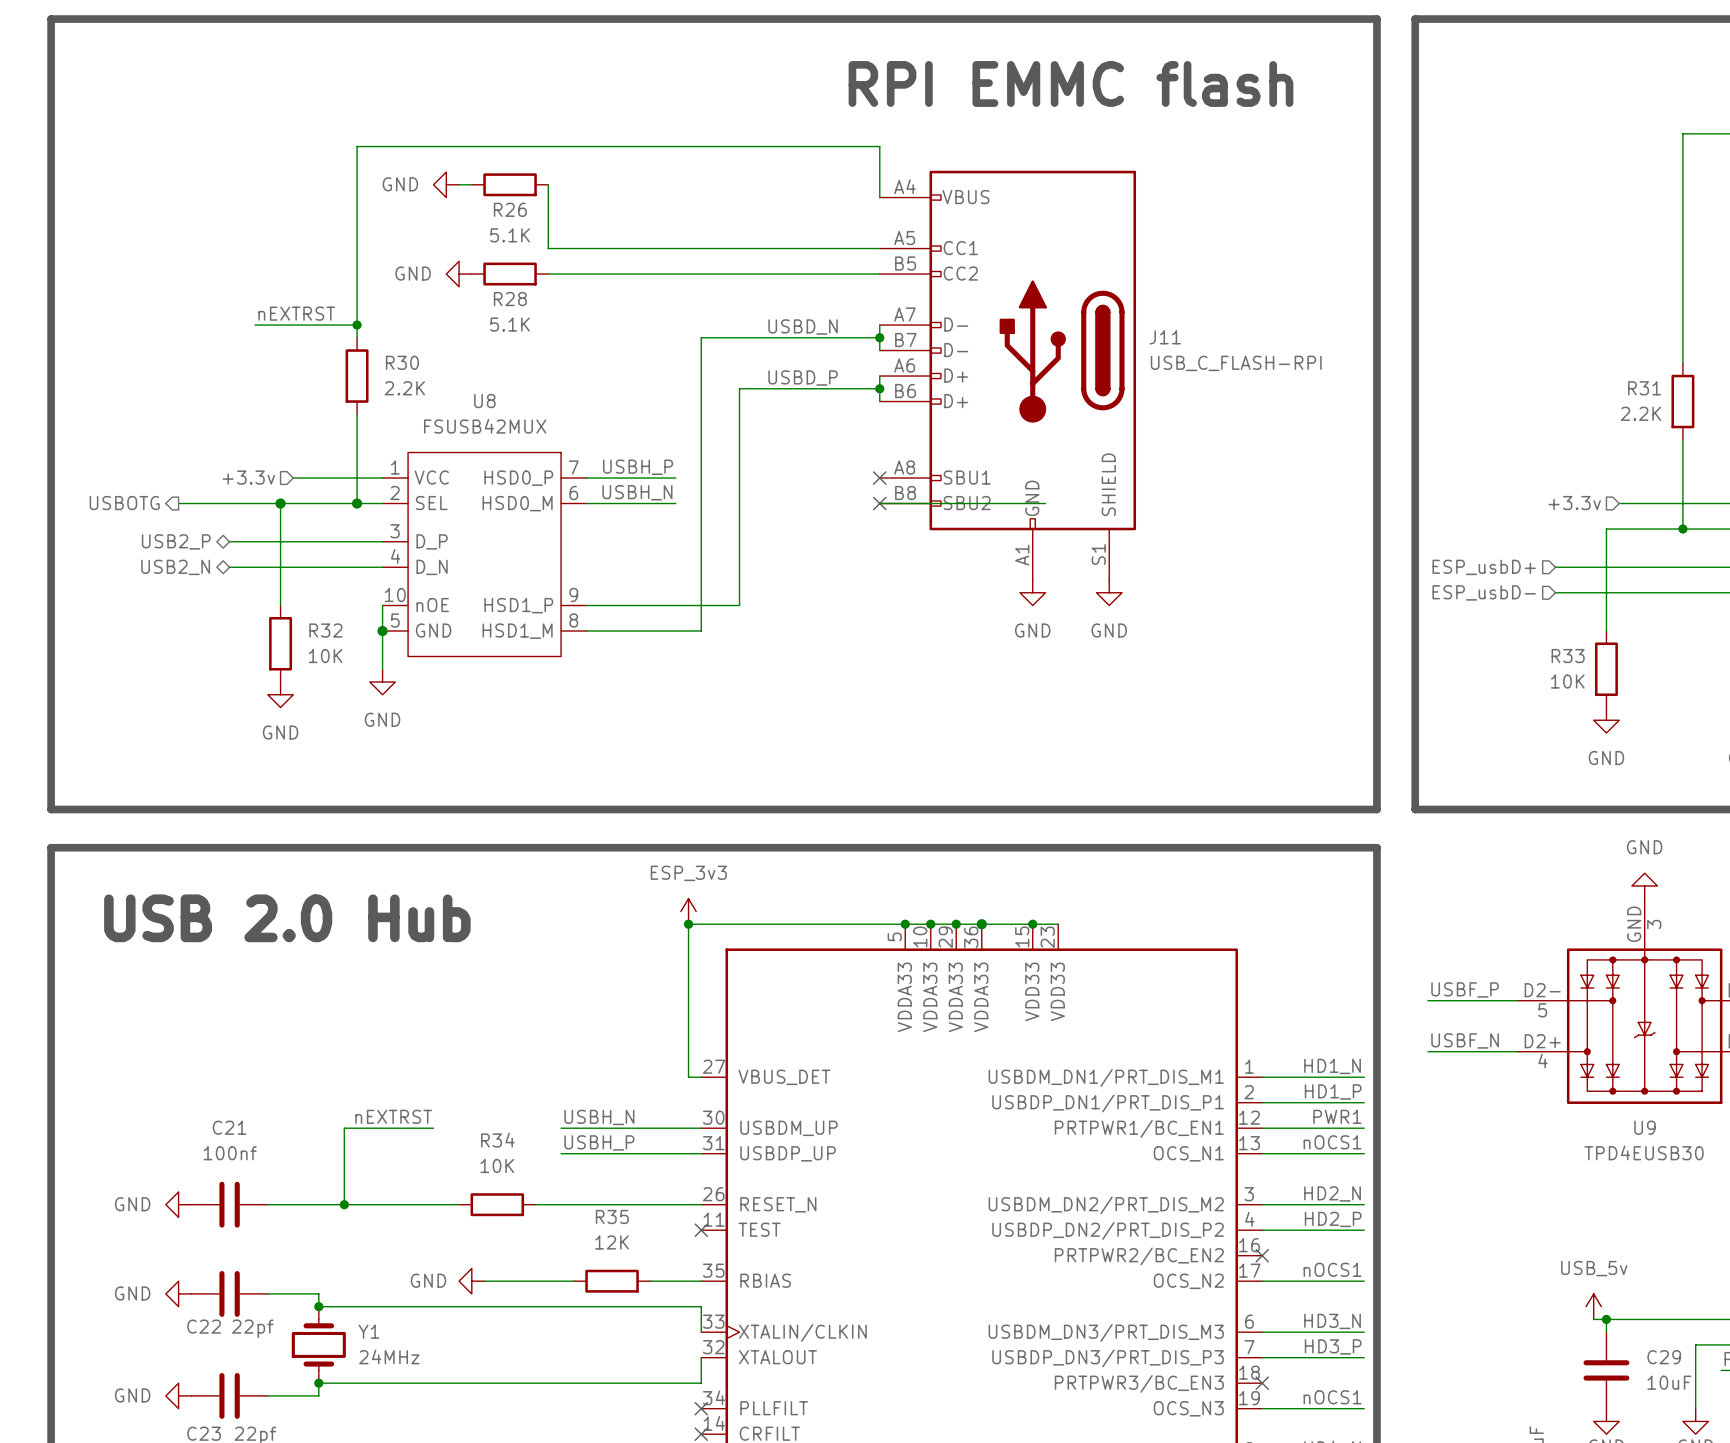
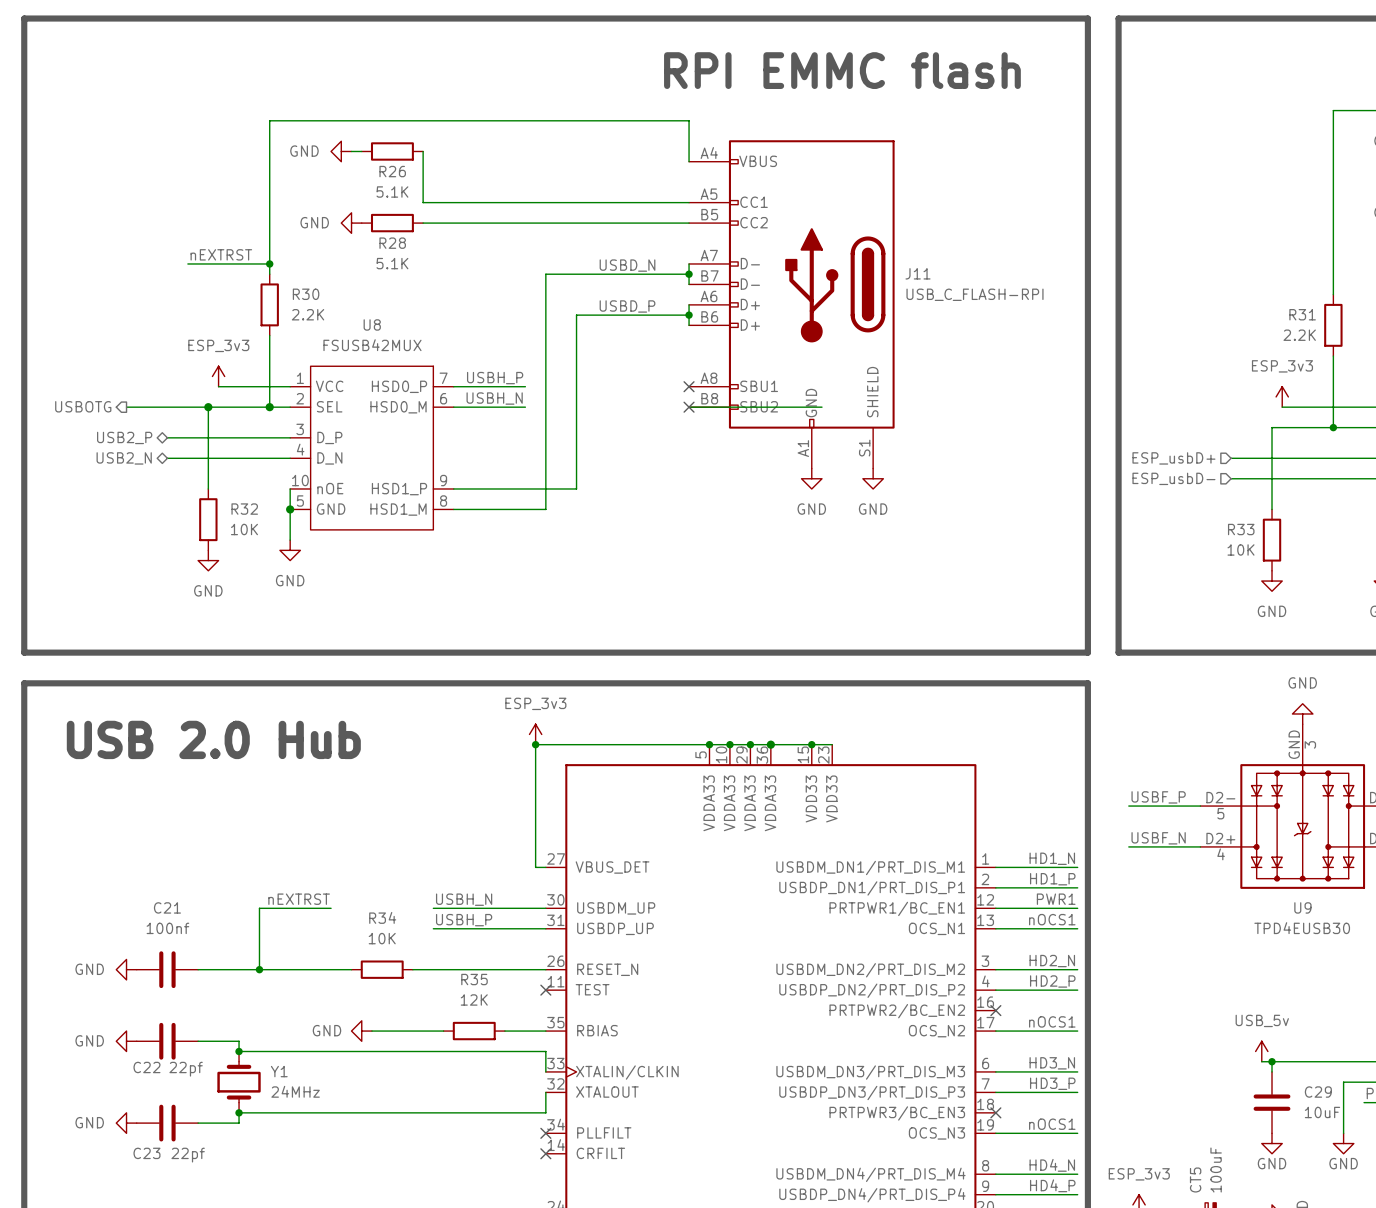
power symbol: none -> ESP_3v3 (218, 376)
hierarchical label: +3.3v (248, 477) -> none
power symbol: none -> ESP_3v3 (1282, 396)
hierarchical label: +3.3v (1574, 503) -> none

